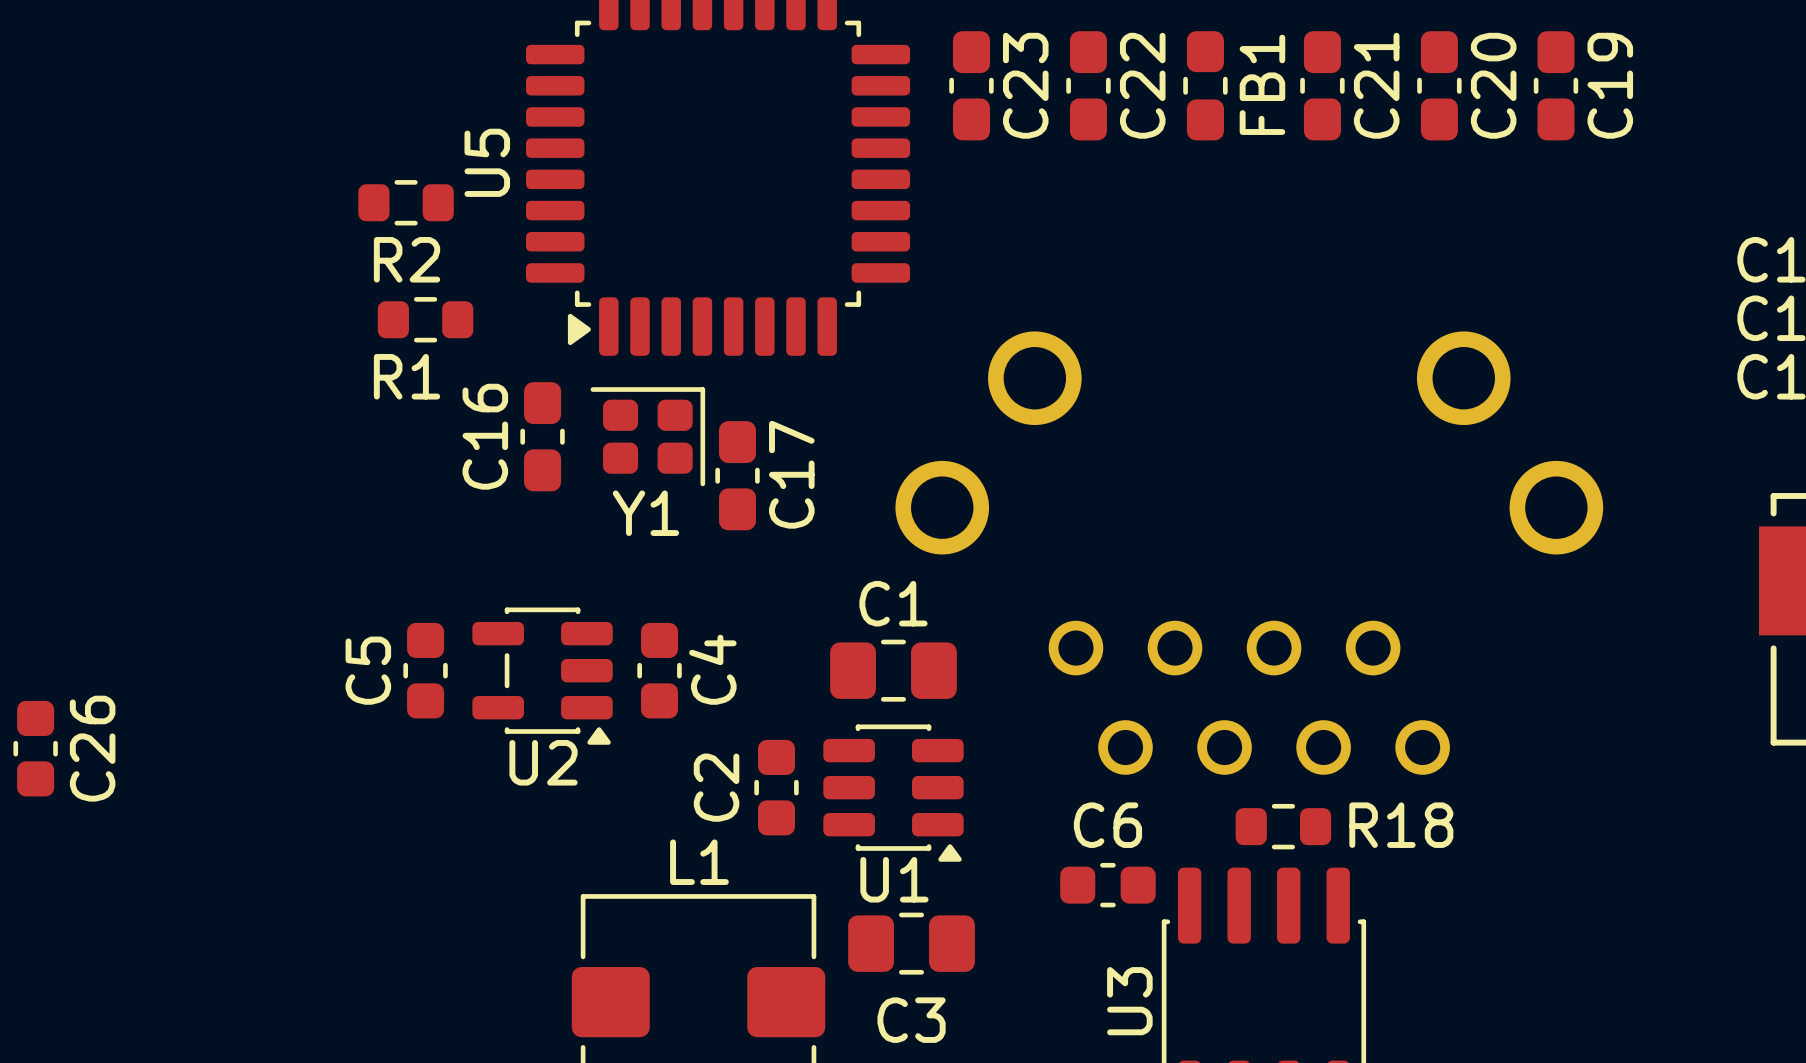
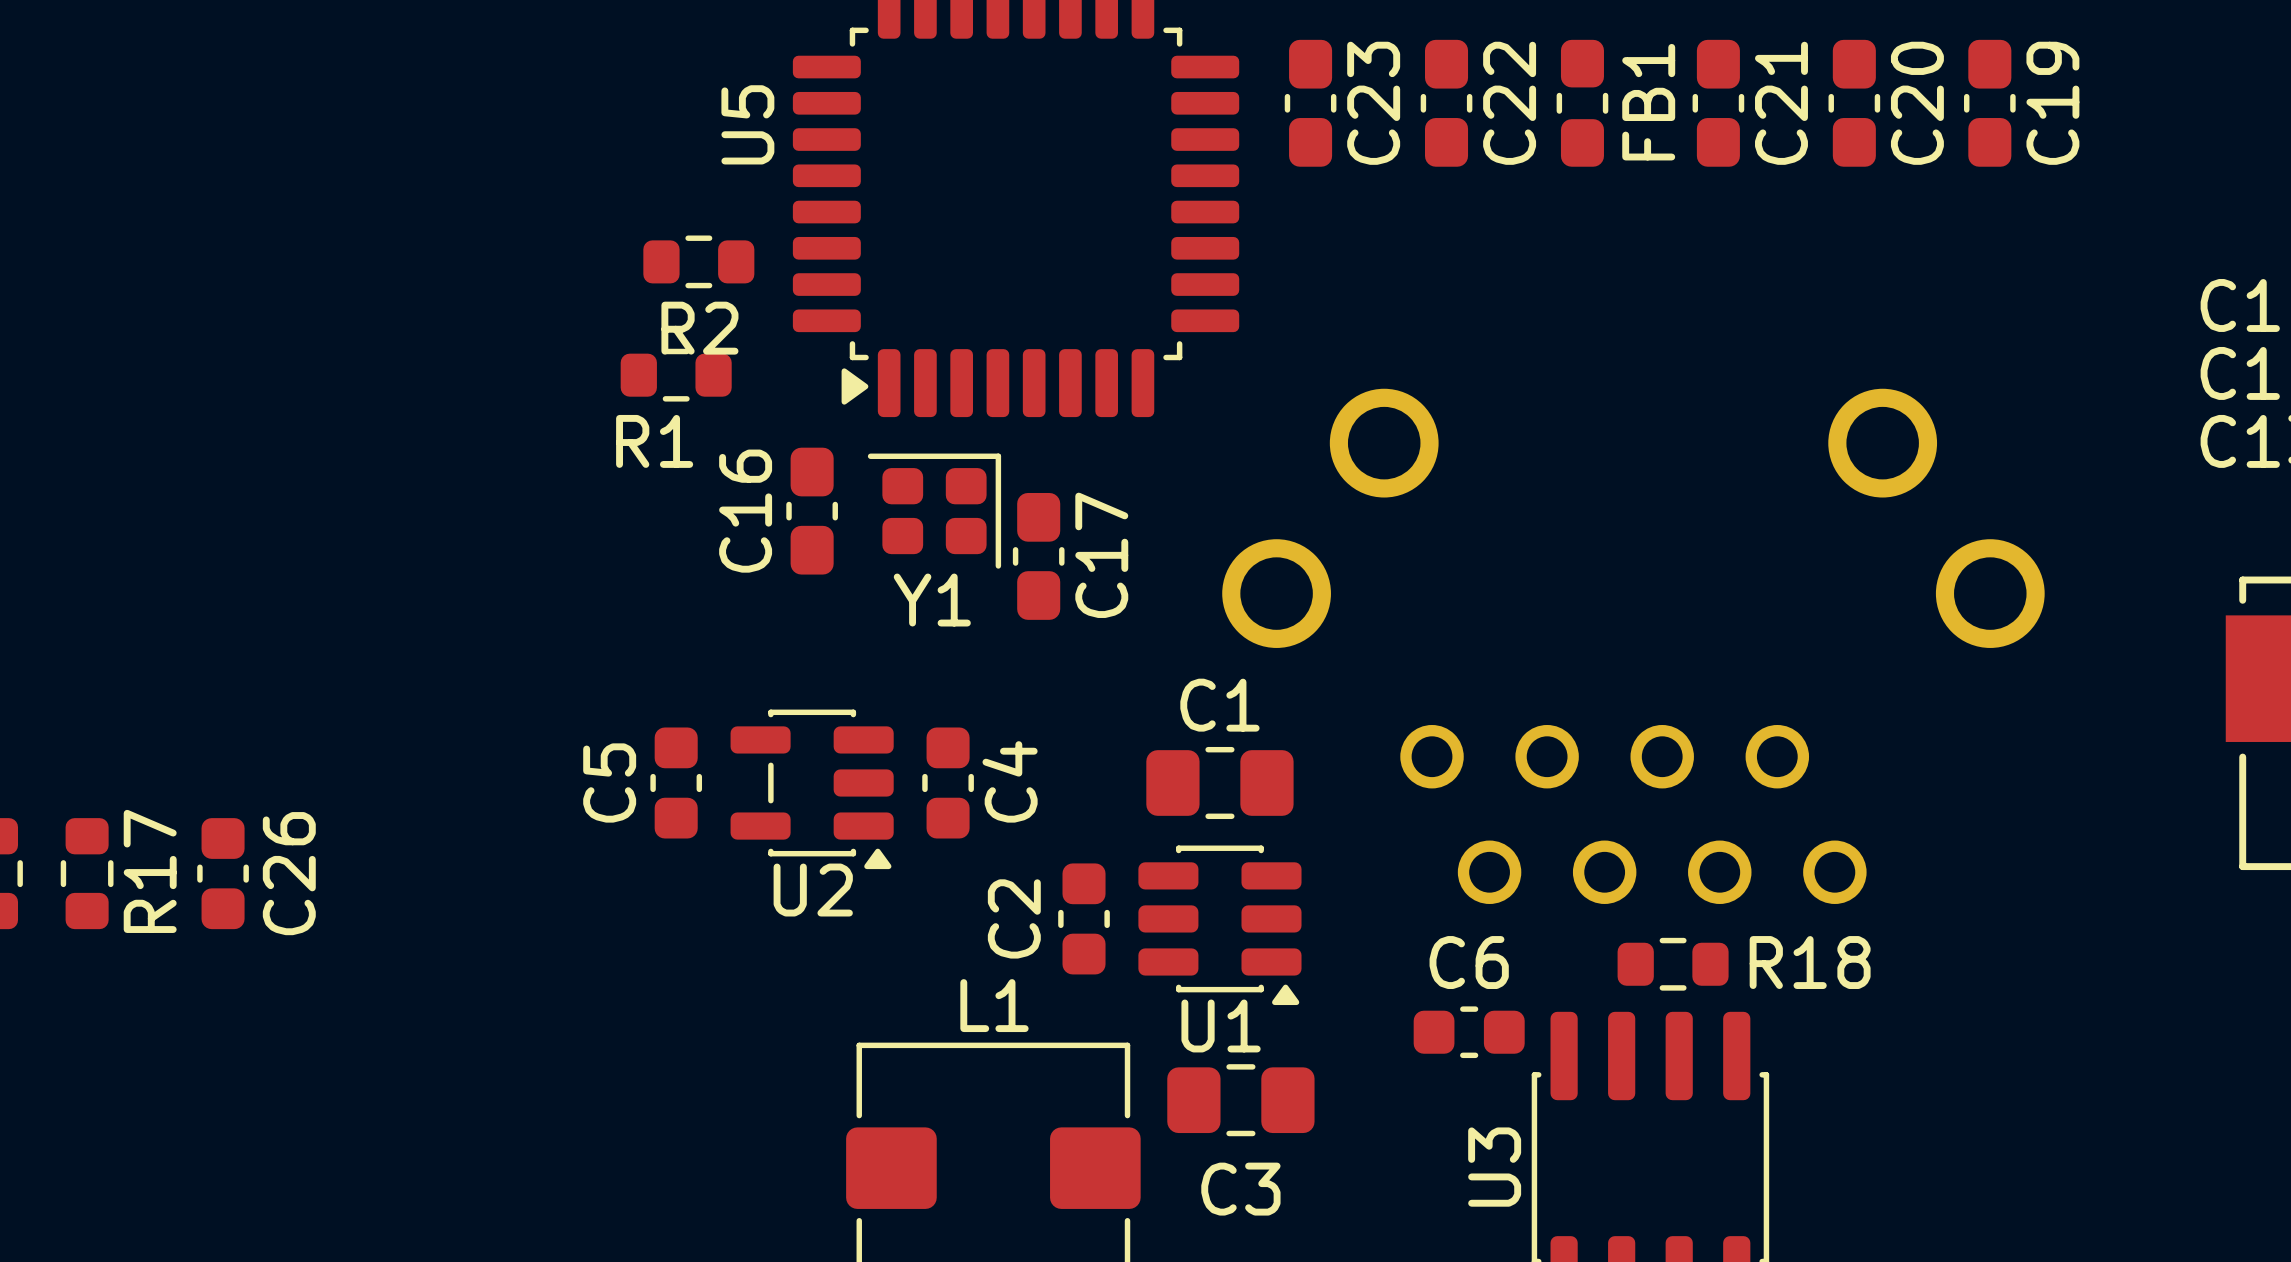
U5 name position: U5 (487, 162) -> U5 (747, 124)
R2 position: (406, 202) -> (698, 261)

